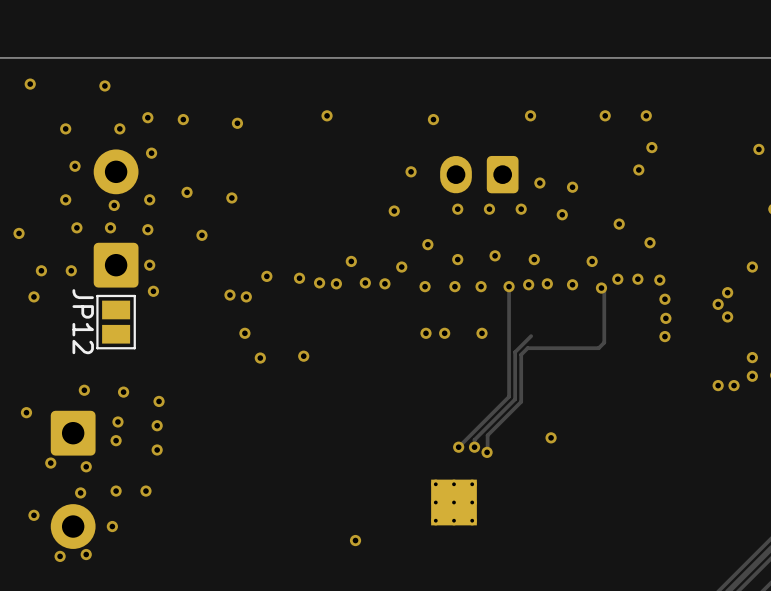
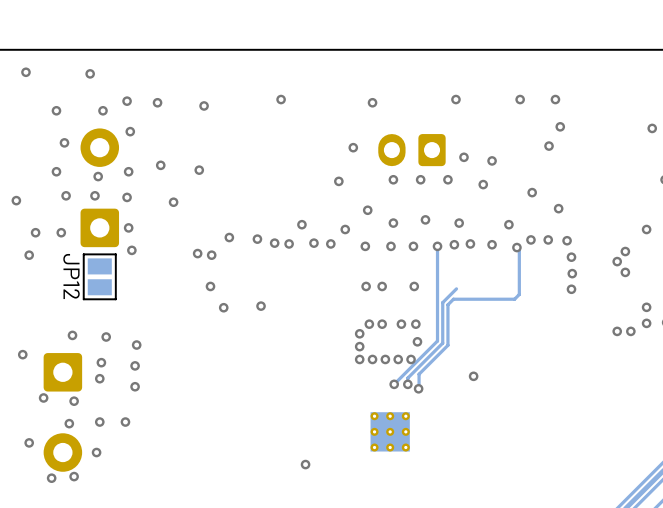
via: none -> (369, 324)
via: none -> (382, 324)
via: none -> (401, 324)
via: none -> (415, 324)
via: none -> (359, 333)
via: none -> (417, 341)
via: none -> (359, 346)
via: none -> (359, 359)
via: none -> (372, 359)
via: none -> (385, 359)
via: none -> (398, 359)
via: none -> (411, 359)

